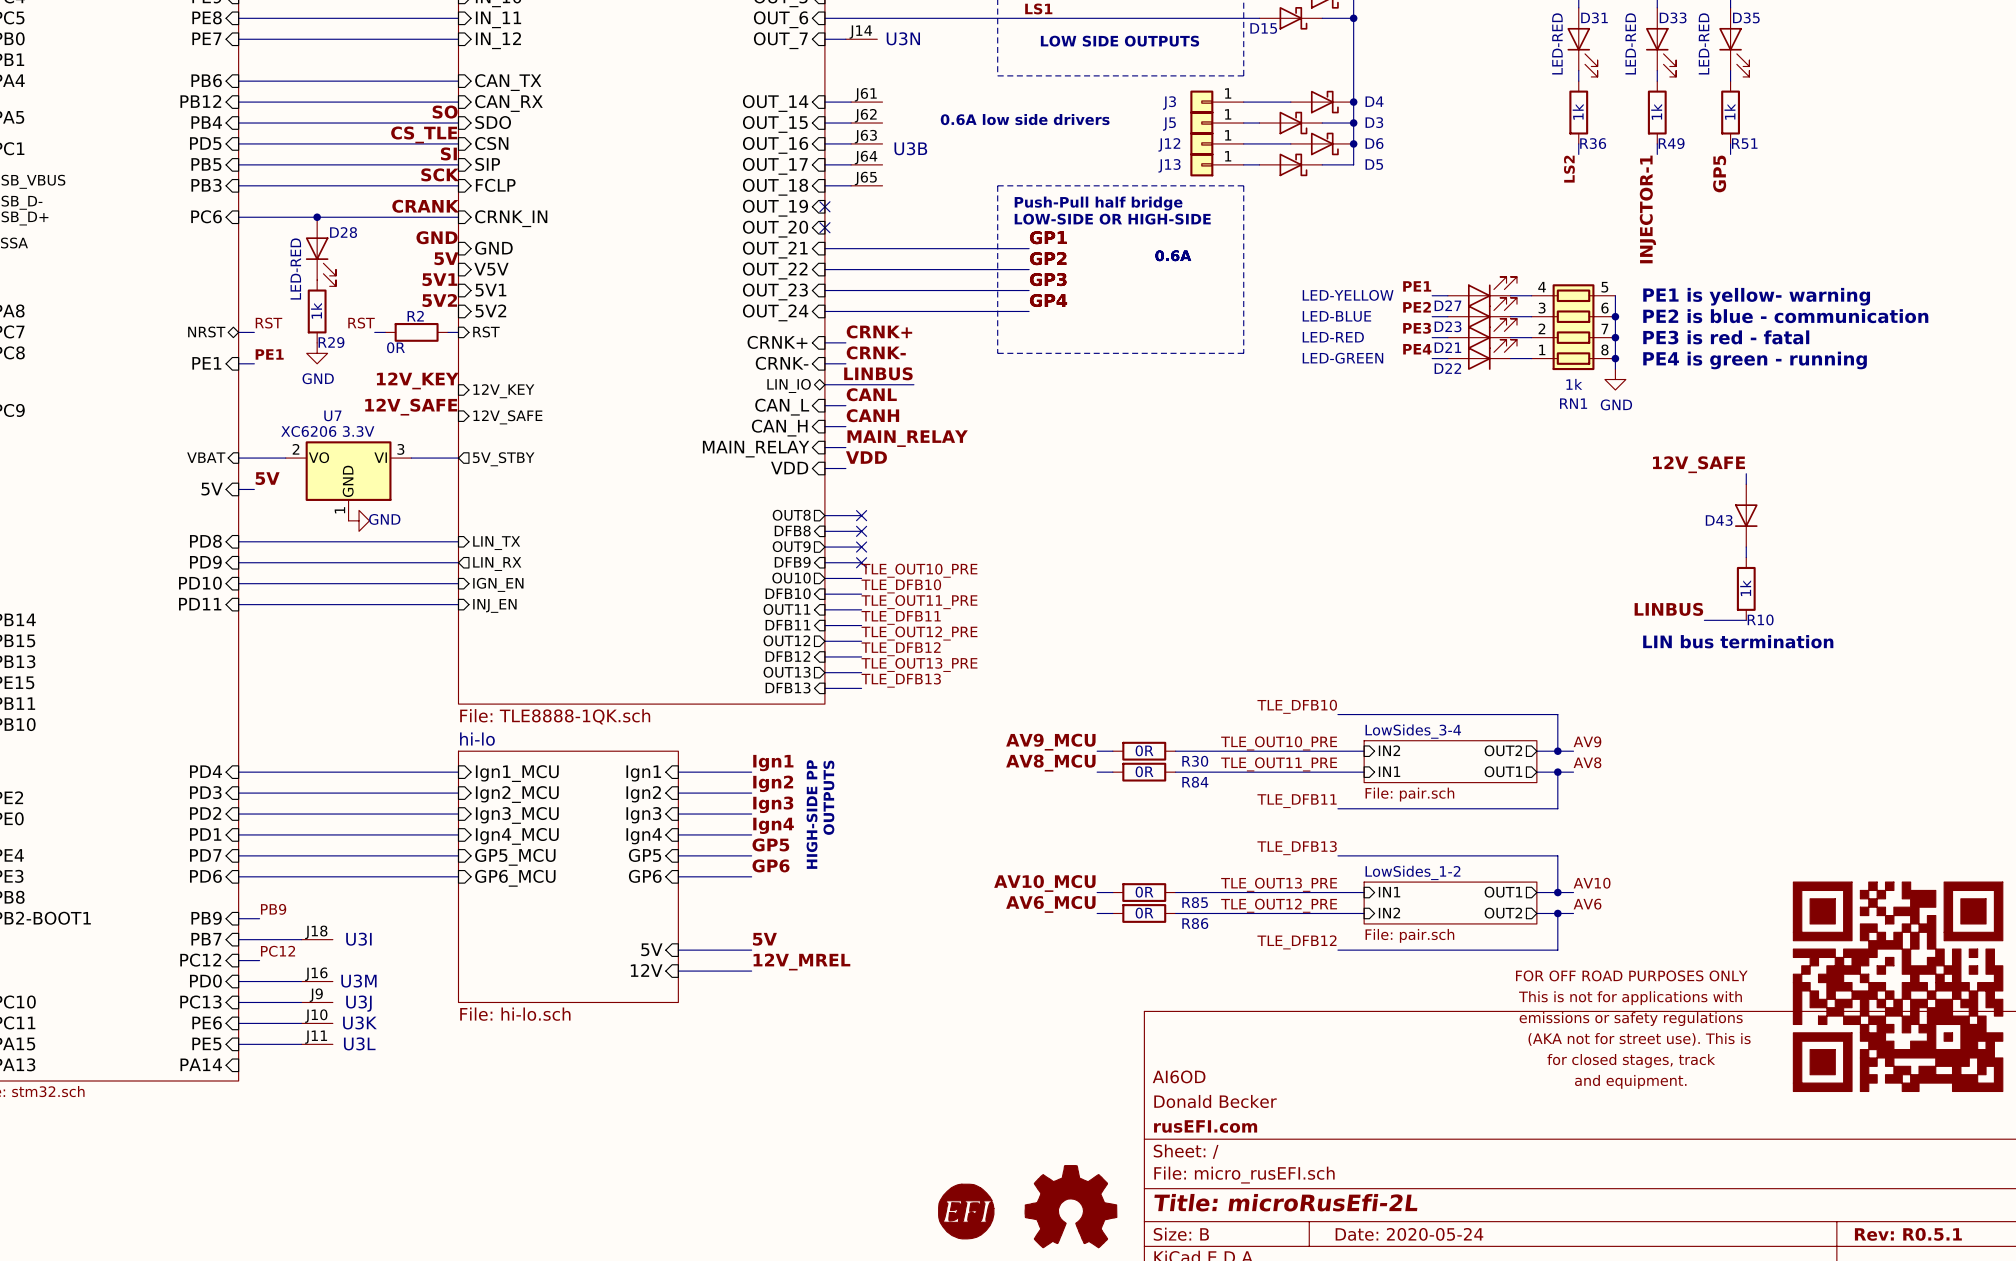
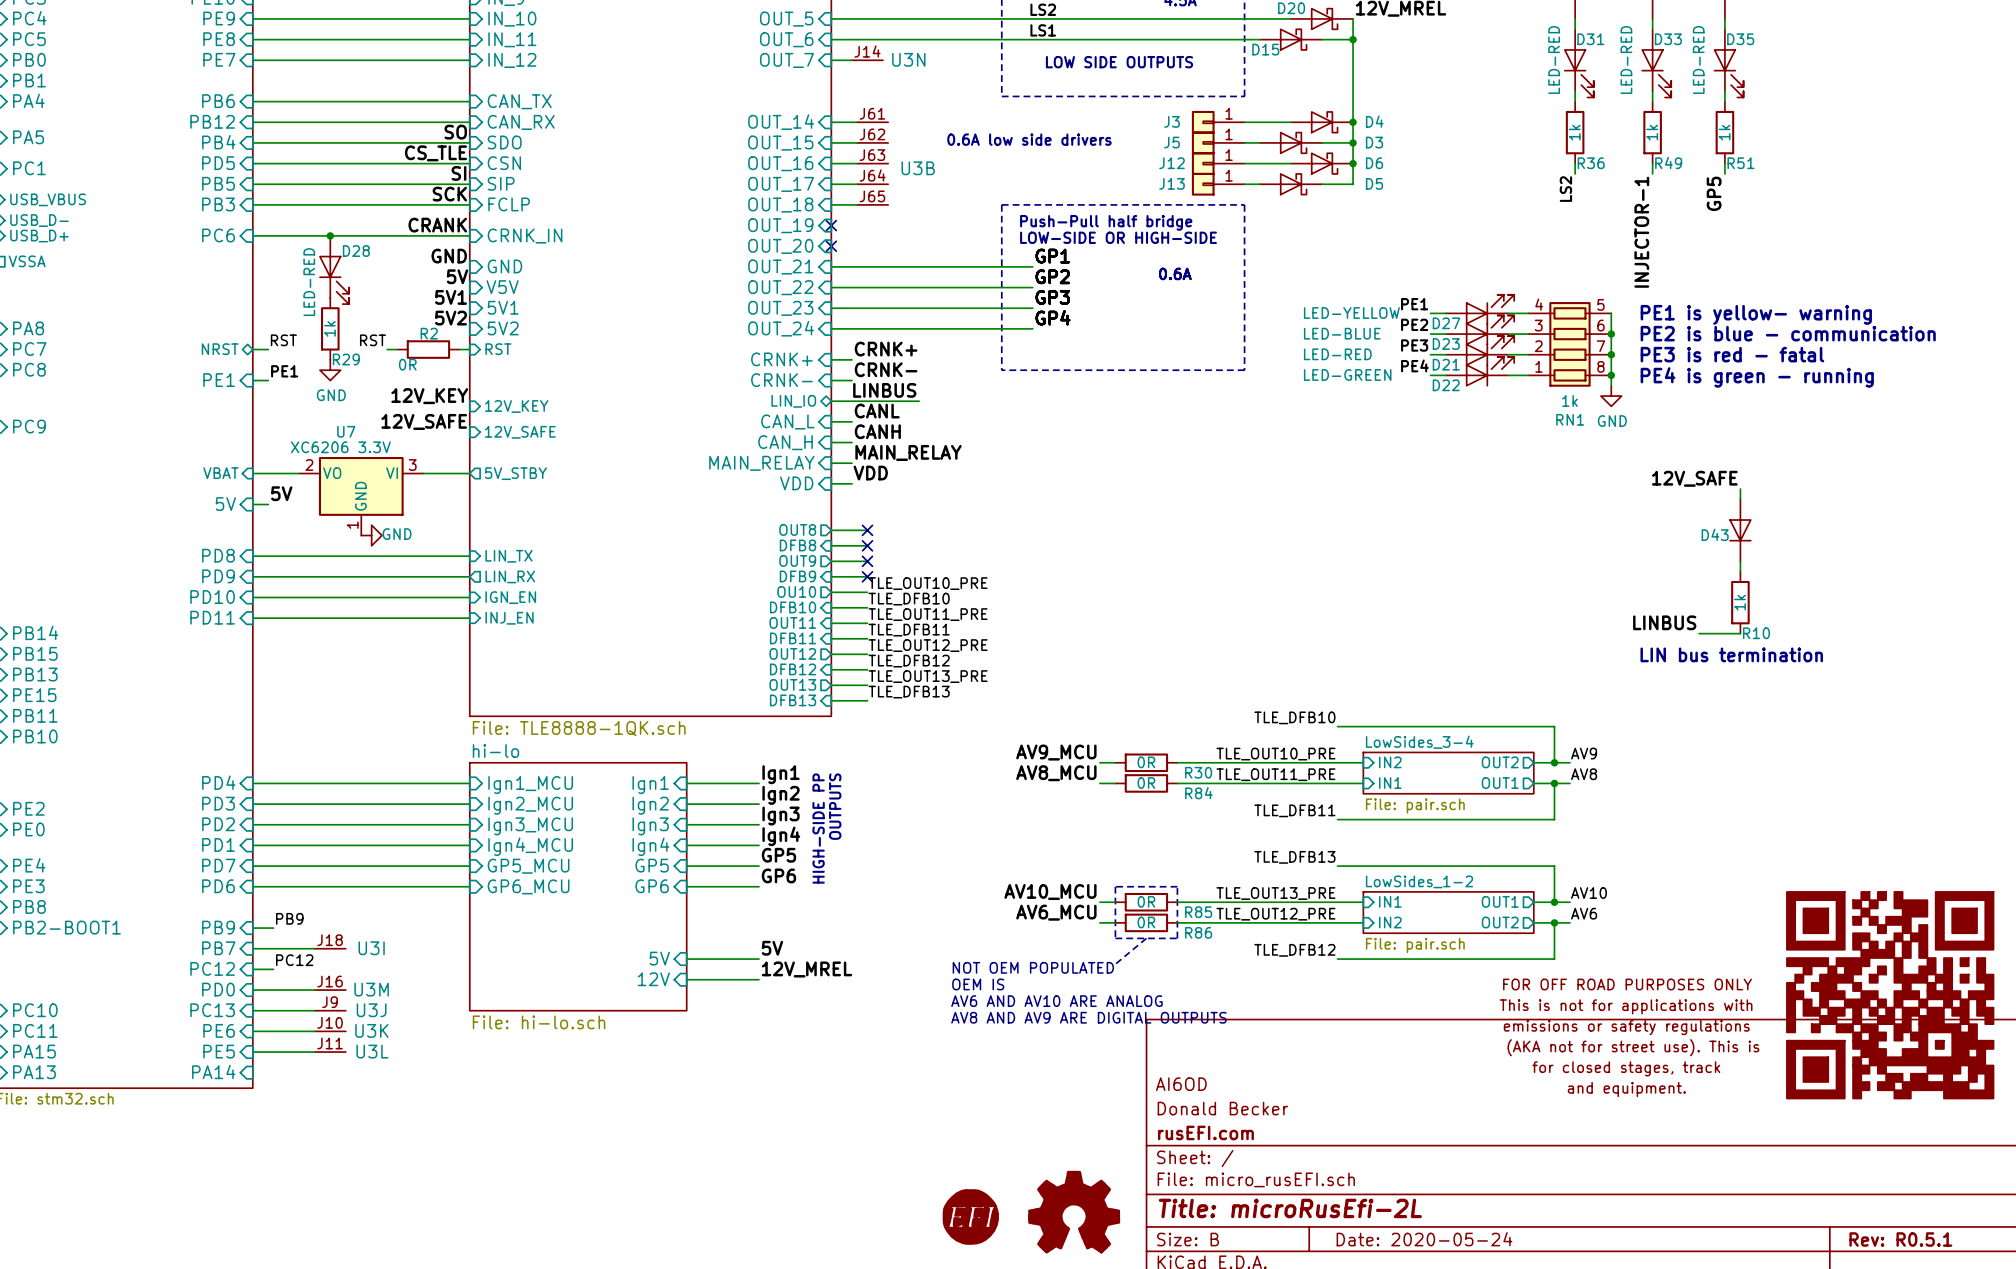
line: none -> (1115, 886) (1115, 938) (1177, 938) (1177, 886) (1115, 886)
line: none -> (1146, 938) (1115, 964)
text: none -> NOT OEM POPULATED (1033, 967)
text: none -> OEM IS (978, 984)
text: none -> AV6 AND AV10 ARE ANALOG (1056, 1001)
text: none -> AV8 AND AV9 ARE DIGITAL OUTPUTS (1088, 1017)

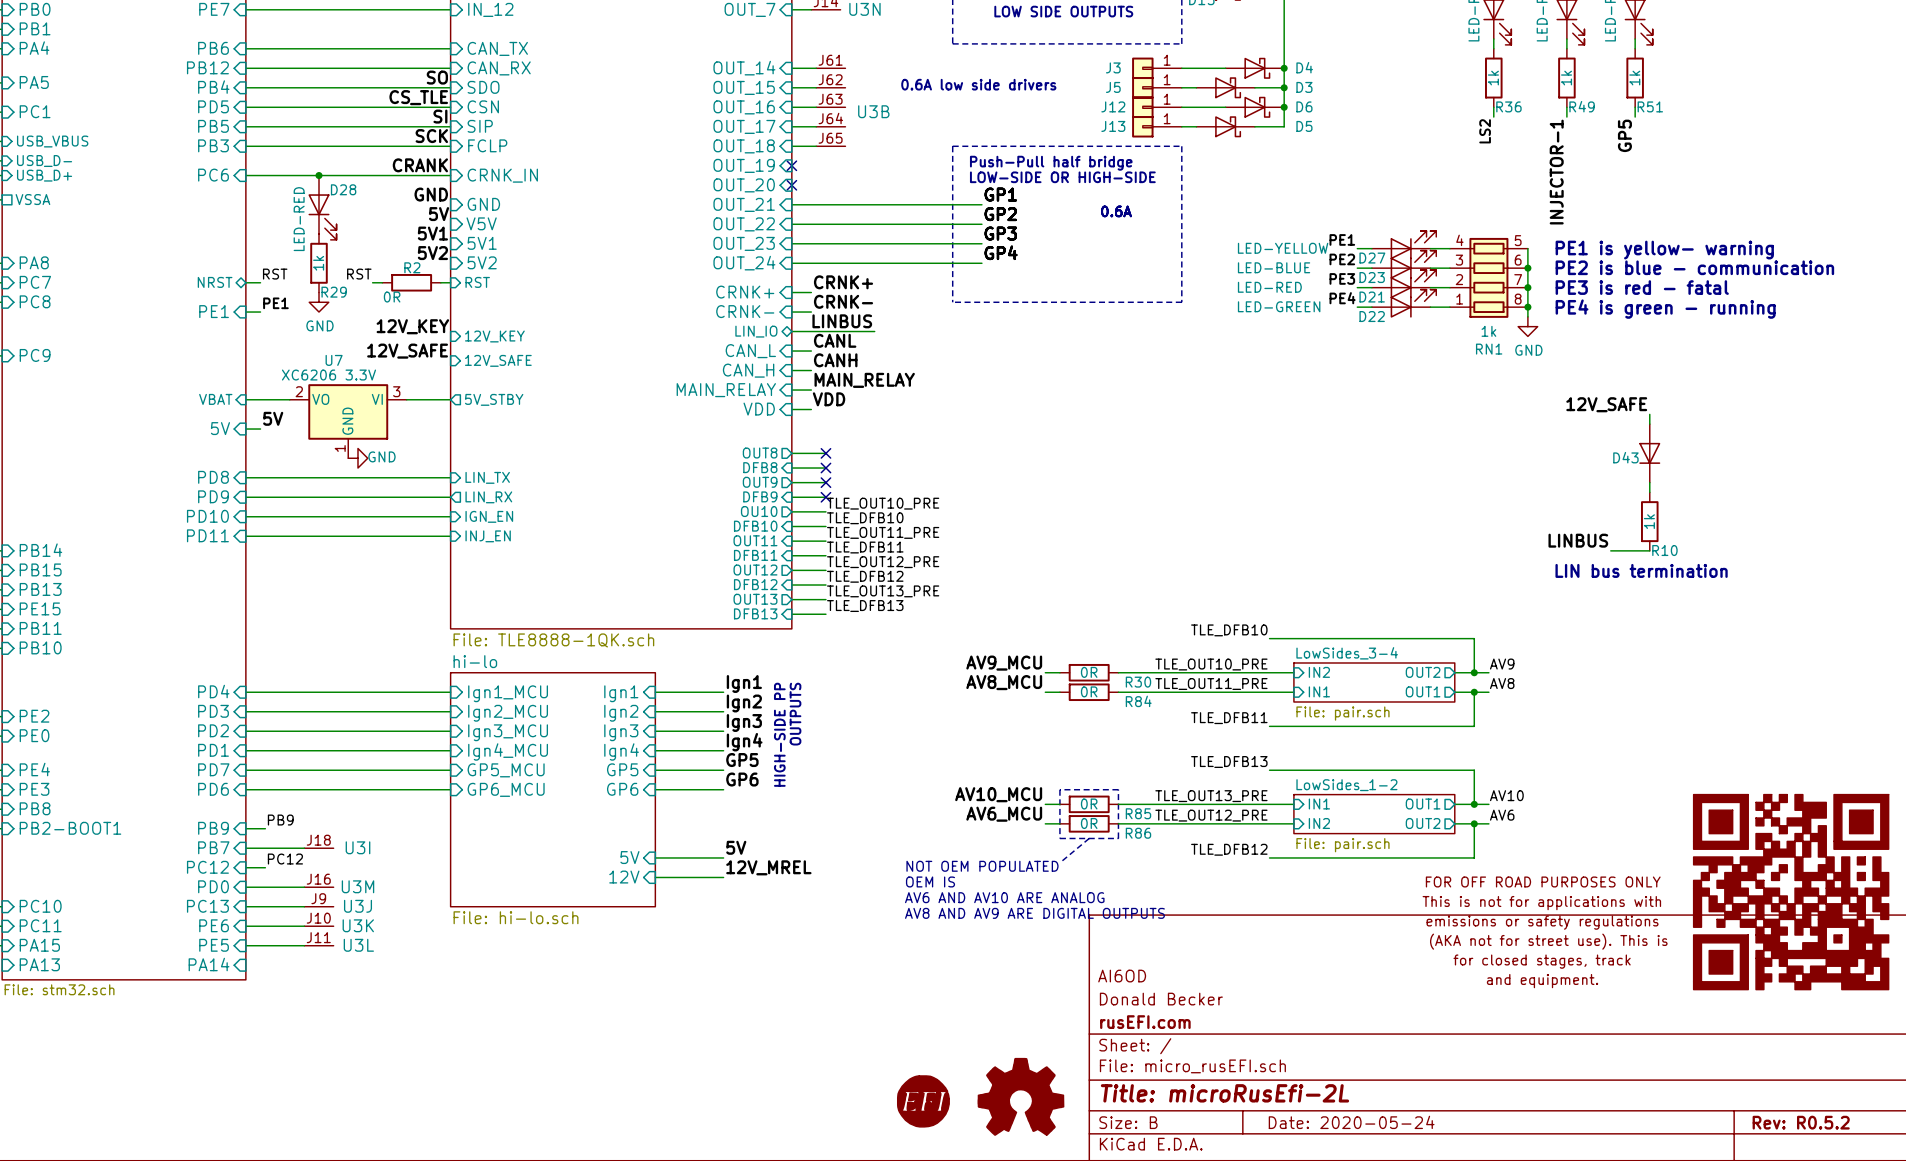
title block: Rev: R0.5.1 (1900, 1239) -> Rev: R0.5.2 (1801, 1122)

